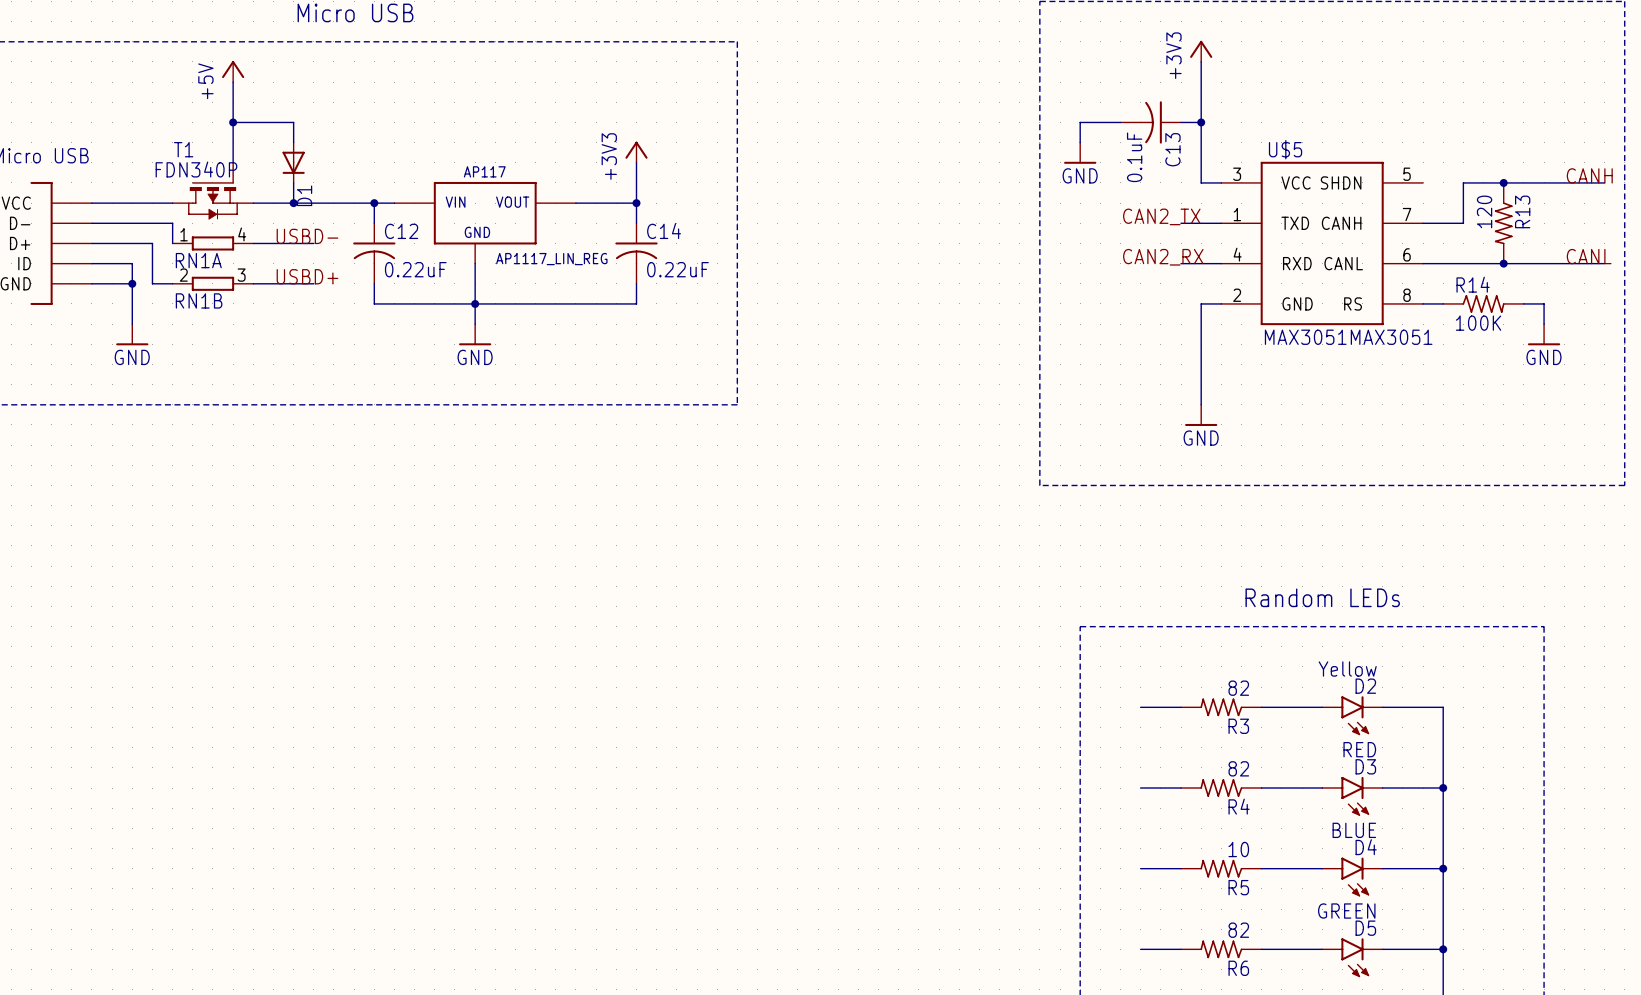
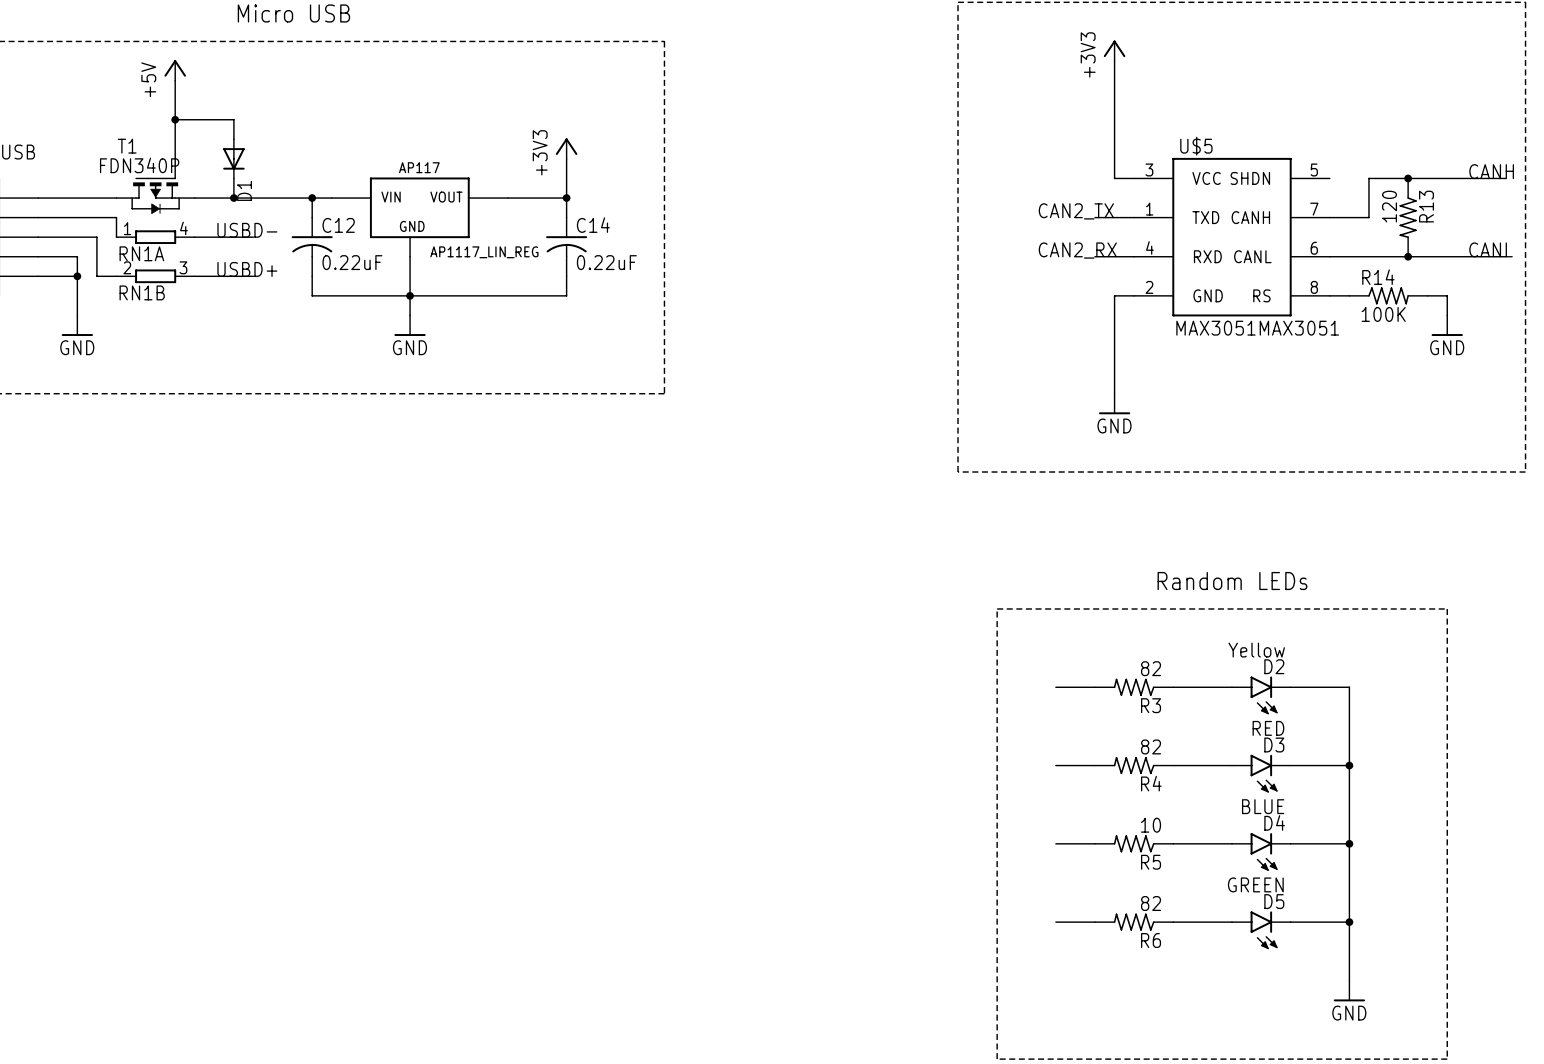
wire: (1120, 122) (1080, 122) (1080, 142) -> none
C13: 0.1uF (1150, 122) -> none
wire: (1181, 122) (1201, 122) -> none
junction: (1201, 122) -> none
power symbol: GND (1080, 153) -> none

